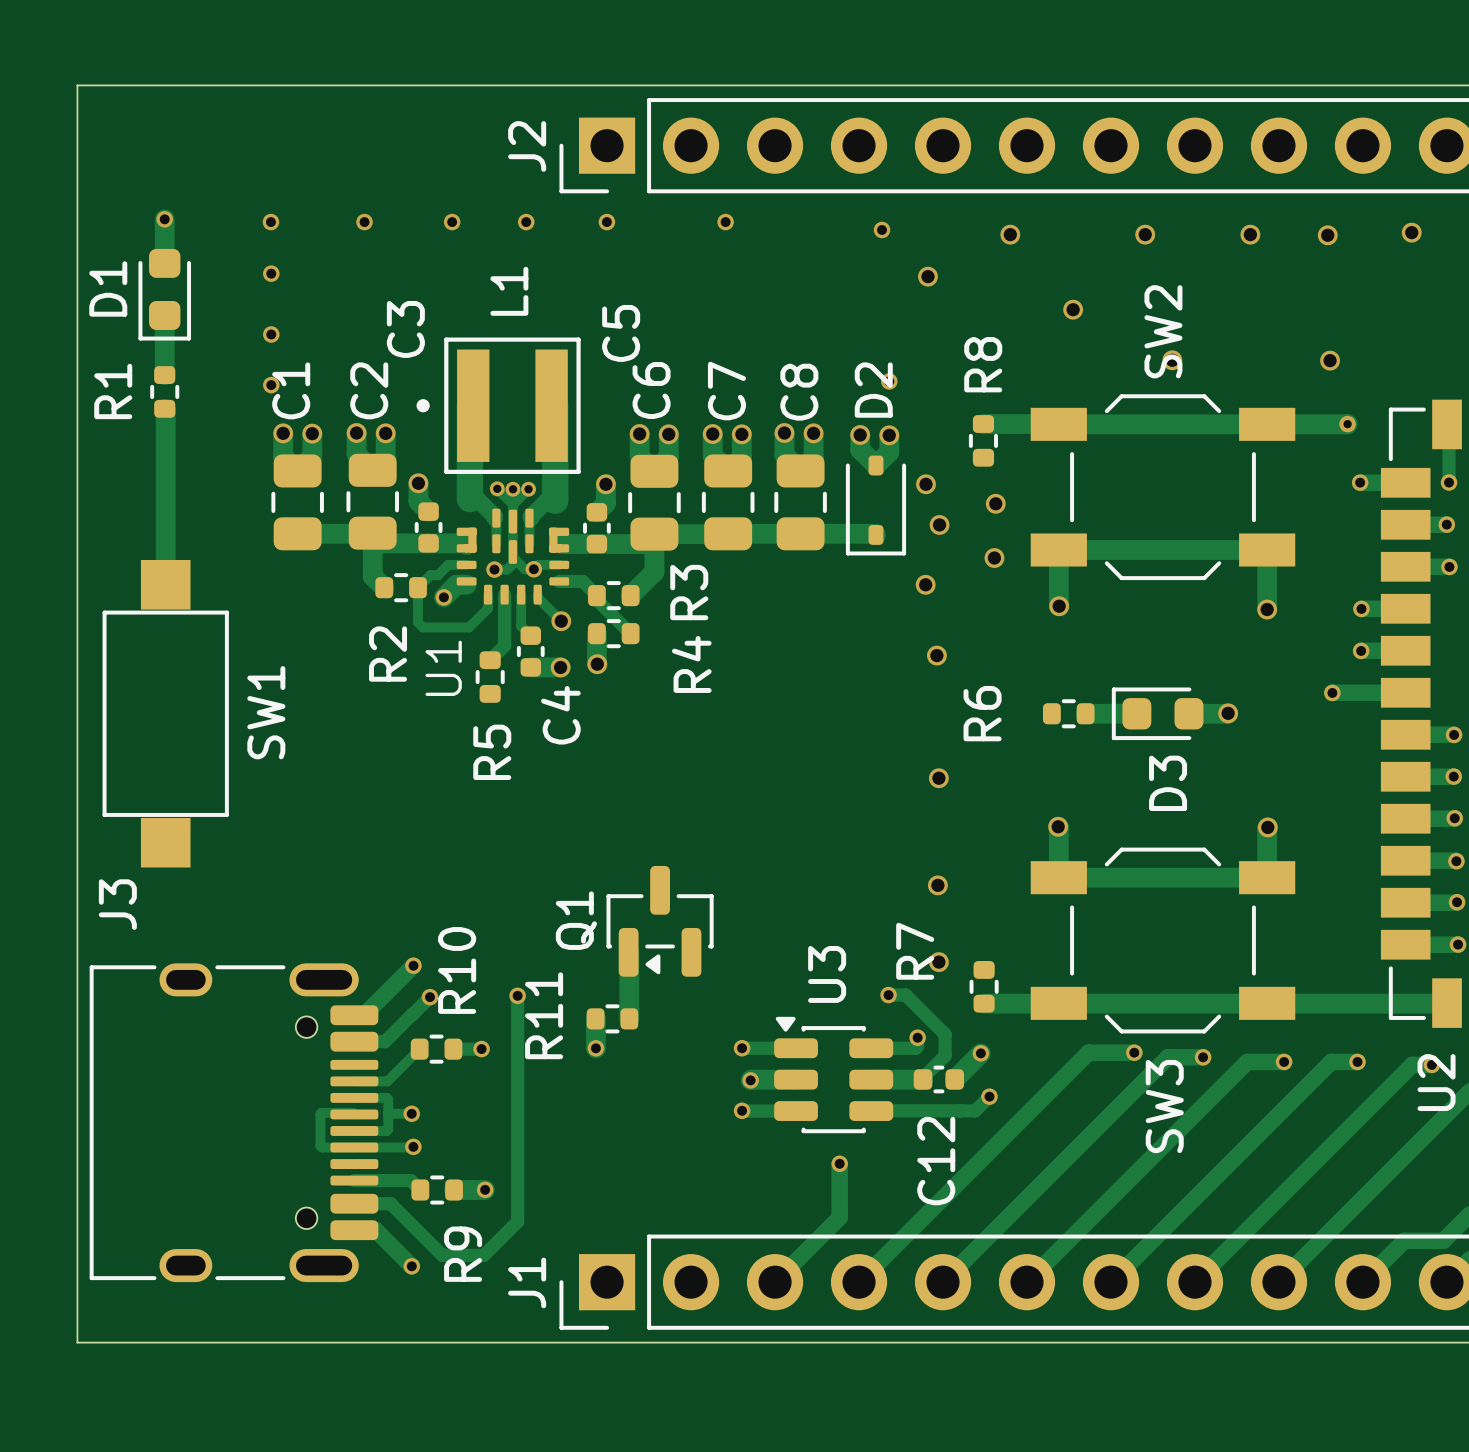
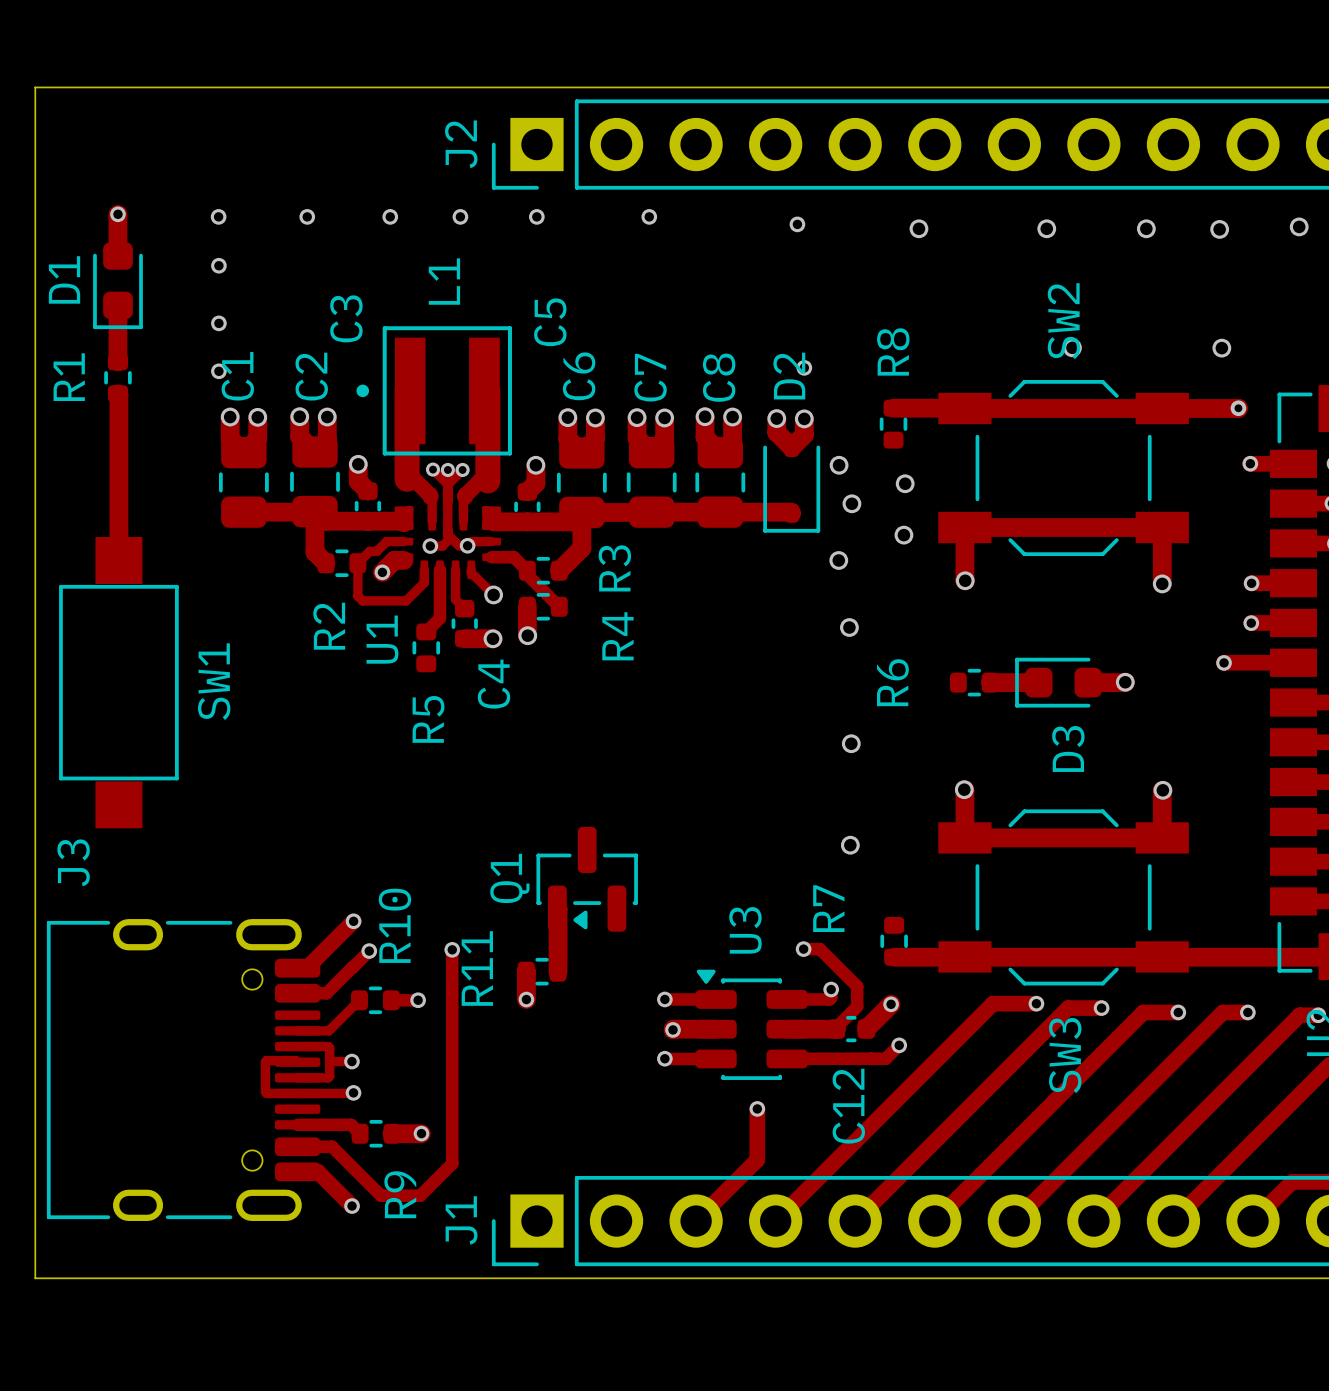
via: (927, 276) -> none
via: (1073, 309) -> none
via: (938, 962) -> none

